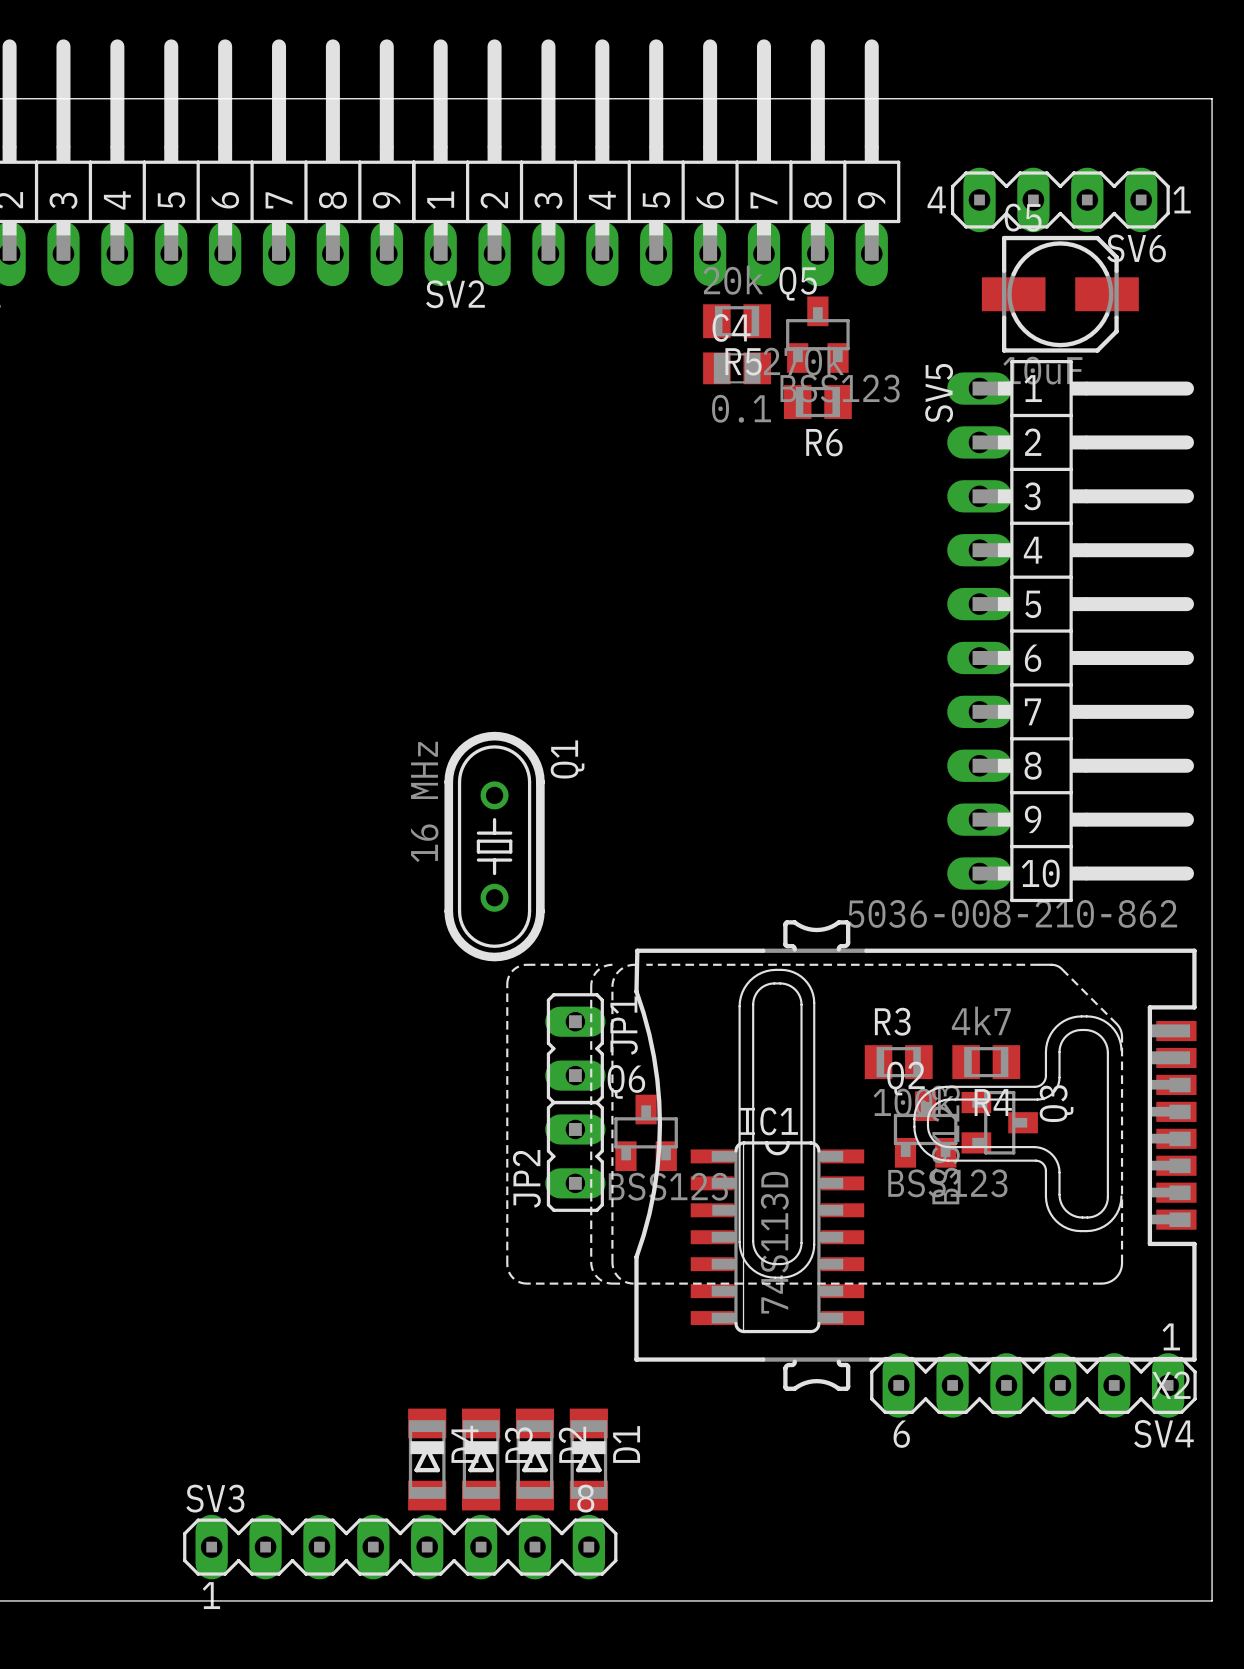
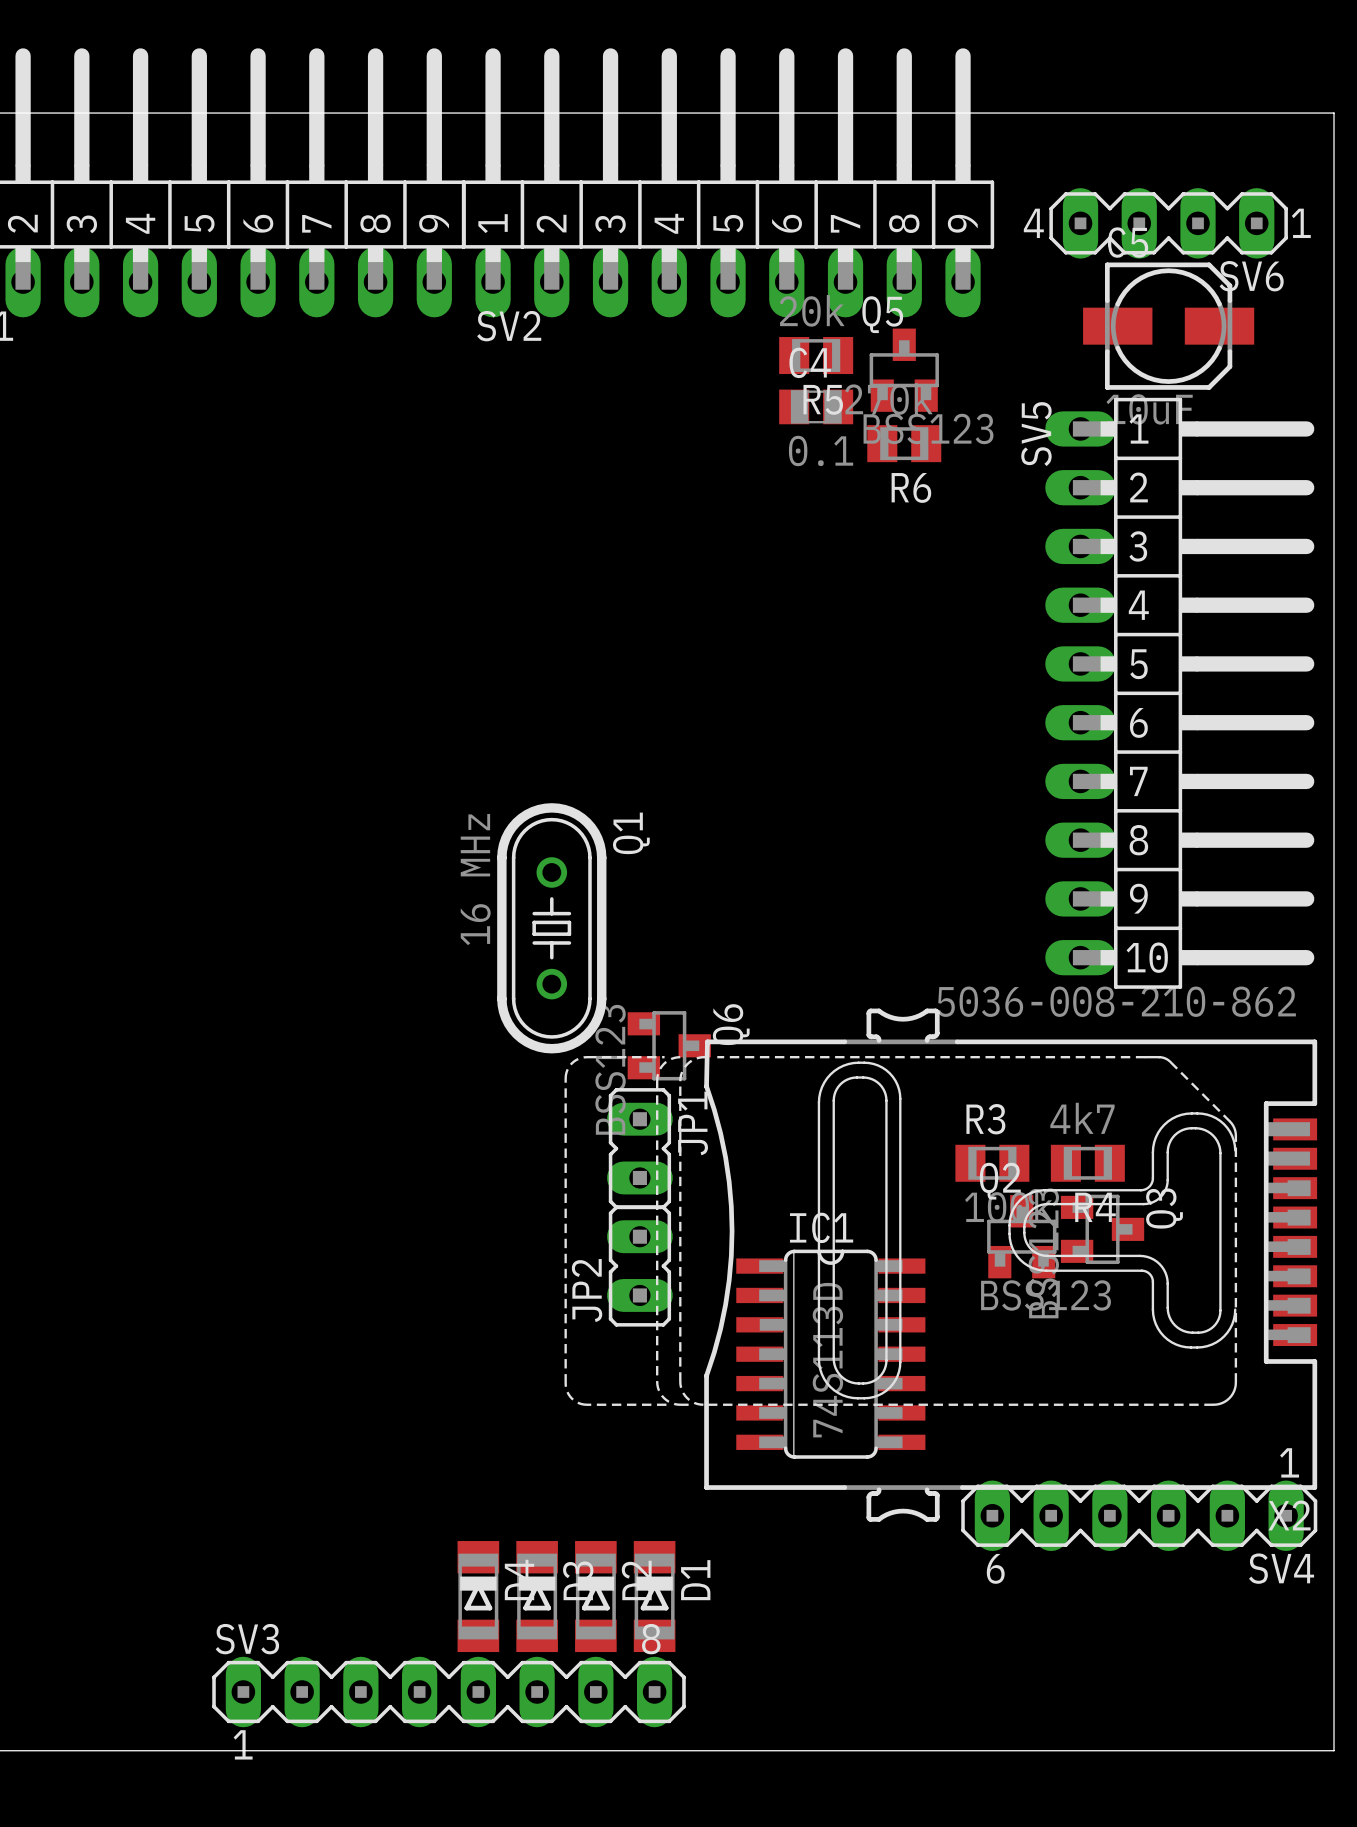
Q6 rotation: 0° (646, 1132) -> 90° clockwise (669, 1045)
Q6 position: (646, 1132) -> (669, 1045)
IC1 position: (777, 1237) -> (830, 1354)

